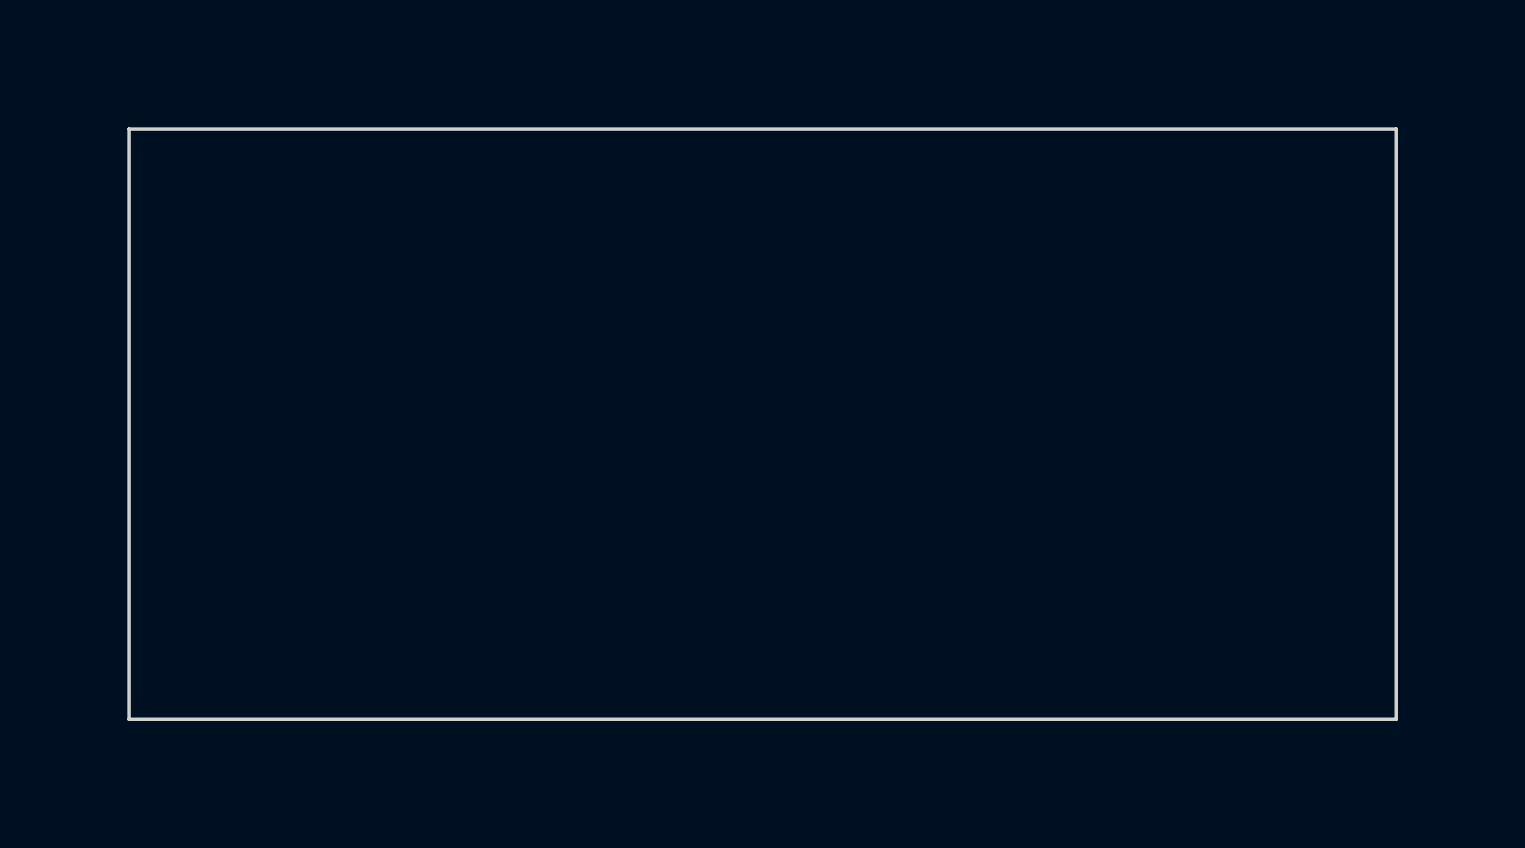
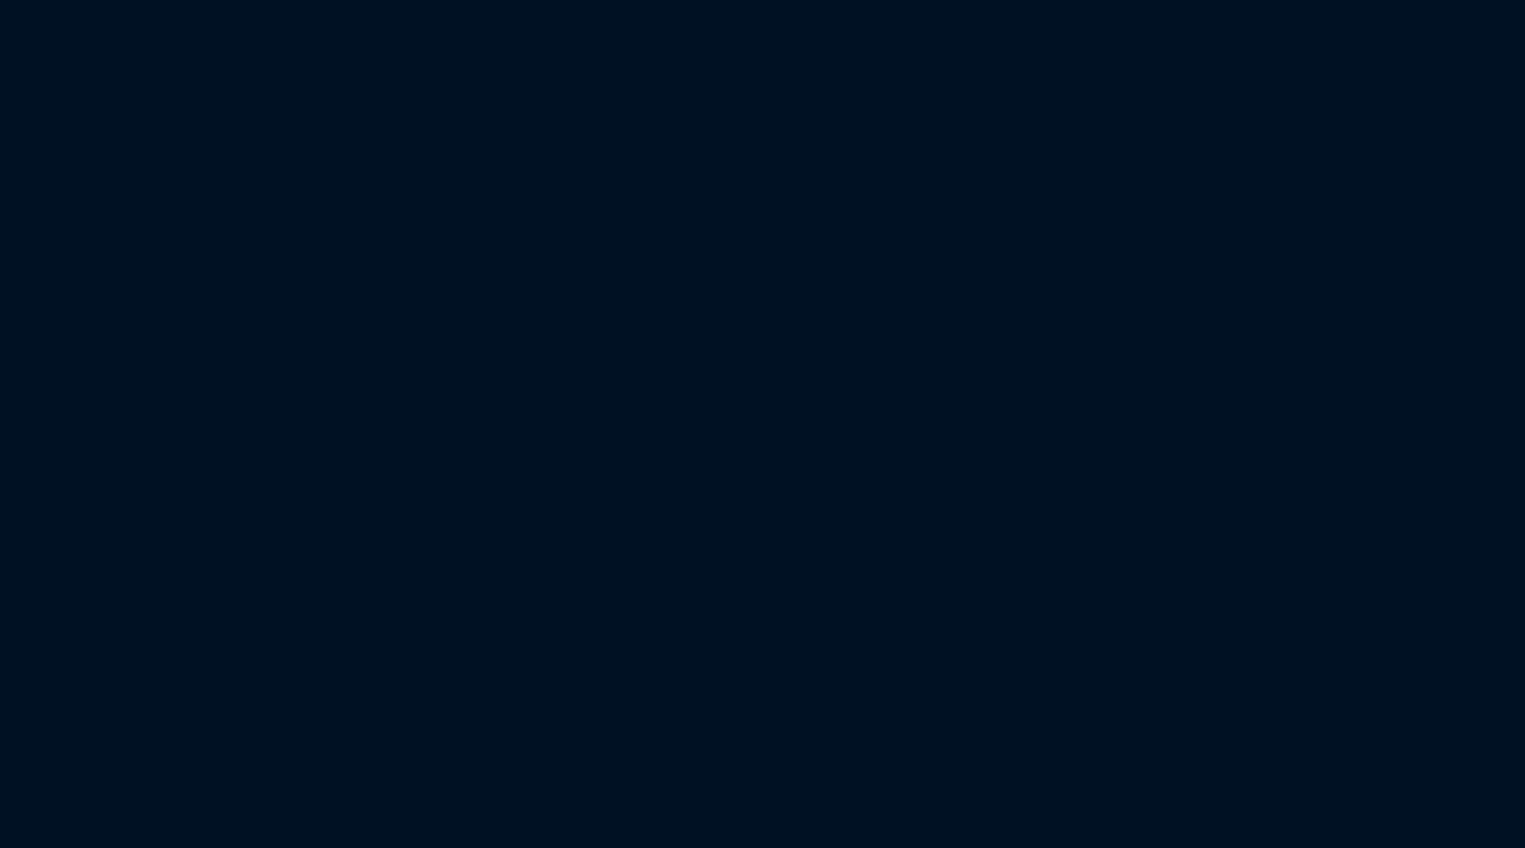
board edge: (1396, 129) (129, 129) (129, 719) (1396, 719) (1396, 129) -> none

